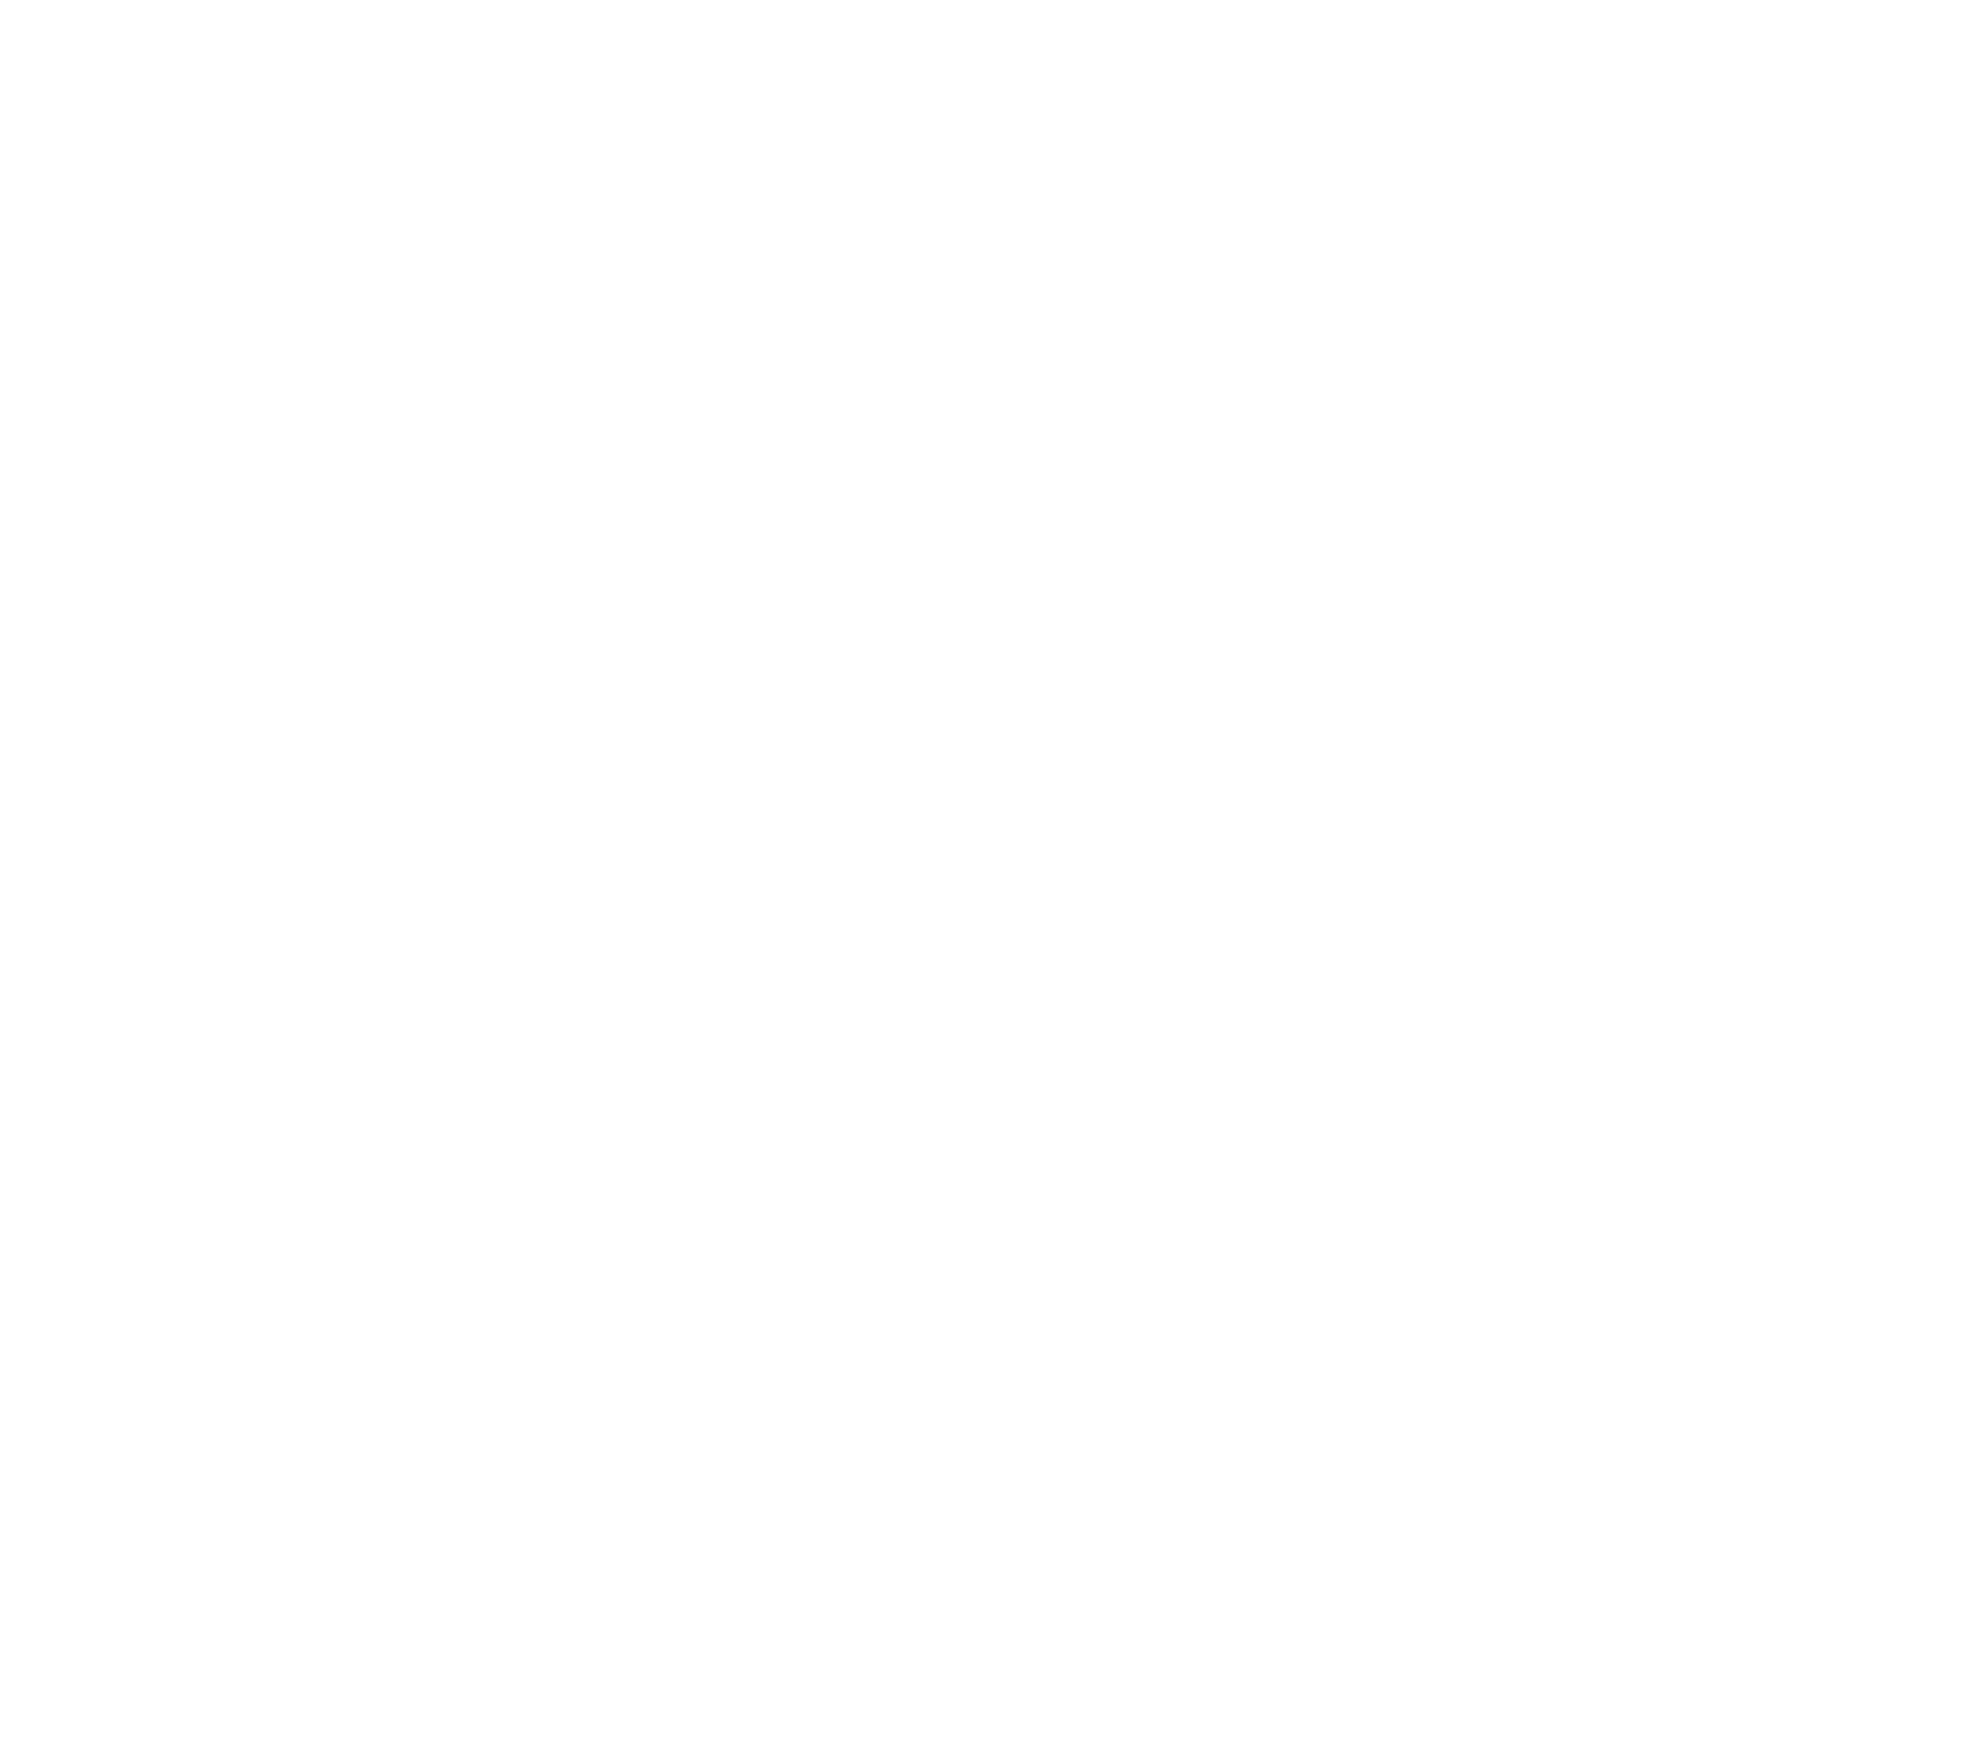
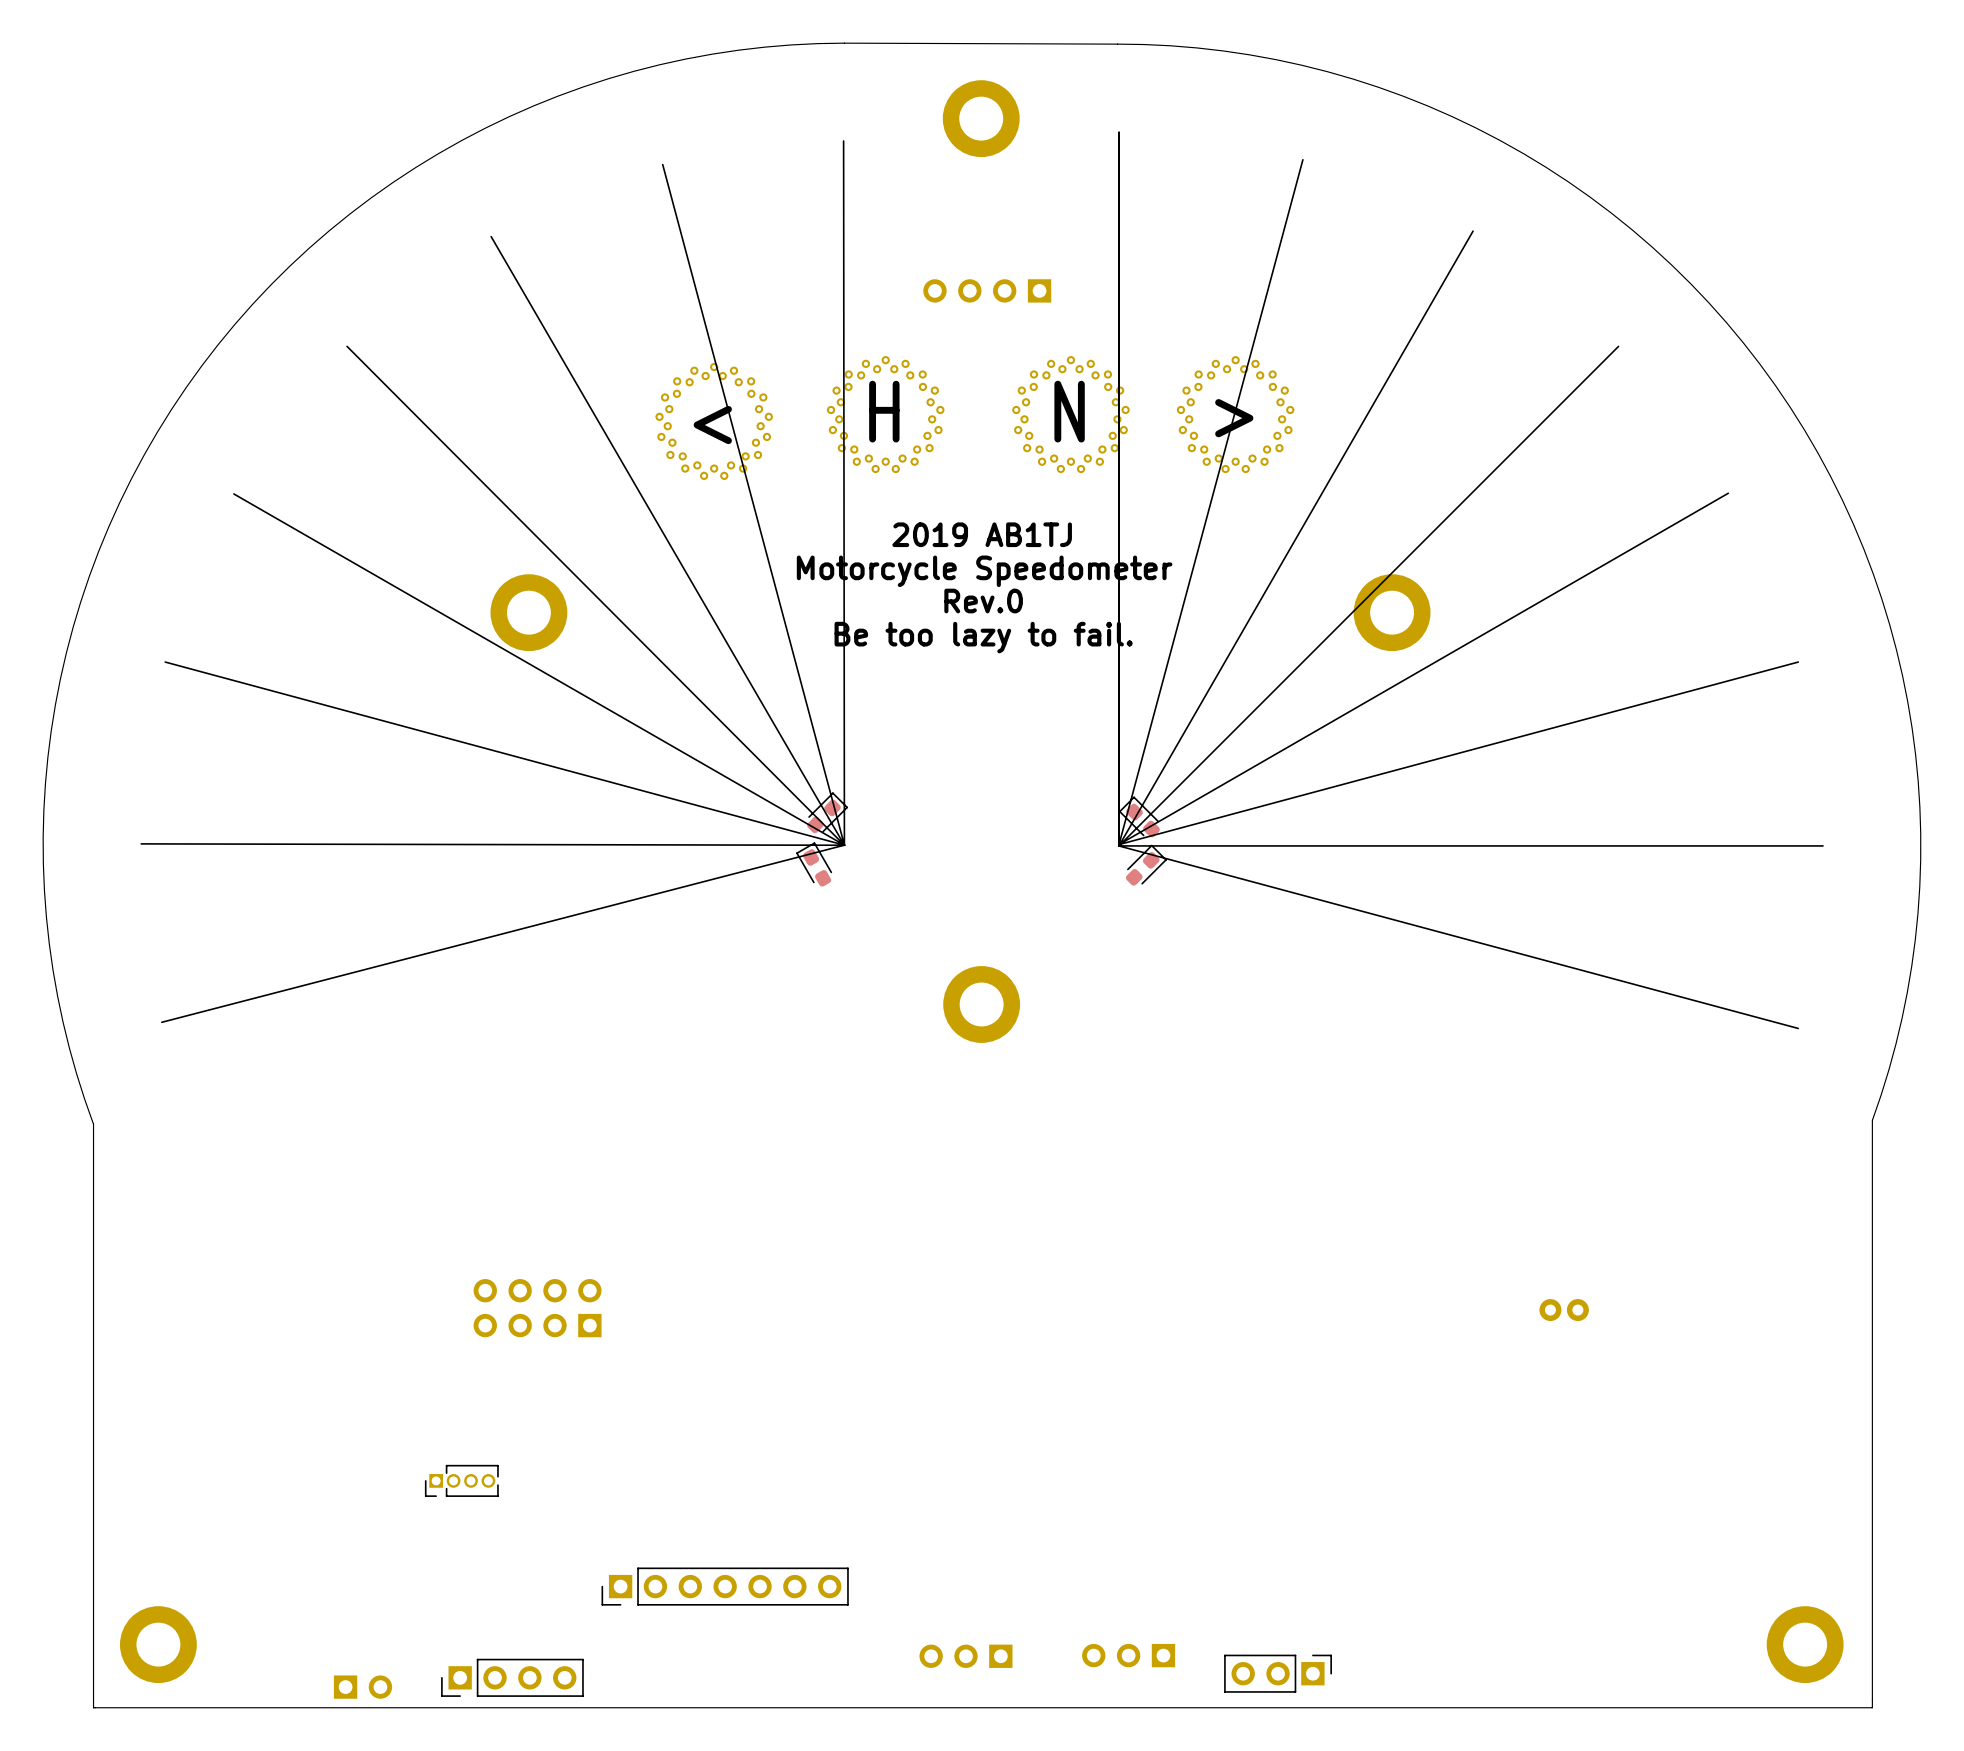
board edge: none -> (844, 43) (1117, 44) (1197, 47) (1249, 54) (1301, 65) (1353, 79) (1428, 106) (1476, 128) (1523, 153) (1568, 181) (1631, 229) (1690, 283) (1726, 322) (1759, 364) (1804, 430) (1830, 476) (1853, 524) (1873, 573) (1889, 624) (1907, 701) (1915, 754) (1919, 807) (1919, 886) (1911, 966) (1895, 1044) (1872, 1120) (1872, 1707) (93, 1707) (93, 1124) (76, 1073) (57, 996) (46, 917) (43, 837) (47, 757) (60, 678) (80, 601) (108, 526) (131, 478) (157, 432) (201, 365) (235, 324) (271, 284) (309, 247) (350, 213) (393, 182) (438, 153) (485, 128) (558, 96) (608, 78) (685, 59) (738, 50) (791, 44) (844, 43)
part: none -> (981, 118)
line: none -> (1119, 132) (1119, 845)
line: none -> (843, 140) (844, 845)
line: none -> (1302, 159) (1119, 844)
line: none -> (662, 164) (844, 845)
line: none -> (1473, 231) (1119, 845)
line: none -> (491, 236) (844, 845)
part: none -> (987, 290)
line: none -> (347, 346) (844, 845)
line: none -> (1618, 346) (1119, 845)
part: none -> (885, 414)
part: none -> (1070, 414)
part: none -> (1235, 414)
part: none -> (714, 421)
line: none -> (233, 493) (844, 845)
line: none -> (1728, 493) (1119, 844)
text: none -> 2019 AB1TJ (982, 534)
text: none -> Motorcycle Speedometer (984, 571)
text: none -> Rev.0 (983, 601)
part: none -> (528, 612)
part: none -> (1392, 612)
text: none -> Be too lazy to fail. (983, 637)
line: none -> (165, 662) (844, 845)
line: none -> (1798, 662) (1119, 844)
part: none -> (827, 812)
part: none -> (1139, 816)
line: none -> (141, 843) (844, 845)
line: none -> (844, 845) (161, 1022)
line: none -> (1119, 845) (1798, 1028)
line: none -> (1119, 845) (1822, 845)
part: none -> (814, 864)
part: none -> (1146, 865)
part: none -> (981, 1004)
part: none -> (537, 1308)
part: none -> (1564, 1310)
part: none -> (461, 1480)
part: none -> (725, 1586)
part: none -> (158, 1644)
part: none -> (1805, 1644)
part: none -> (1128, 1655)
part: none -> (965, 1656)
part: none -> (1278, 1673)
part: none -> (512, 1677)
part: none -> (363, 1687)

